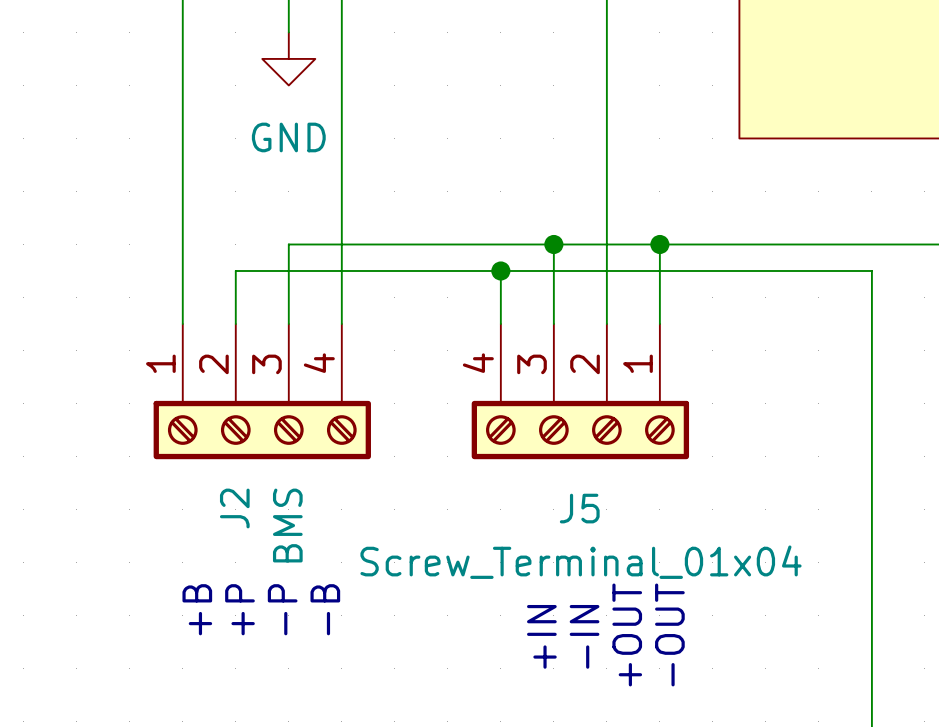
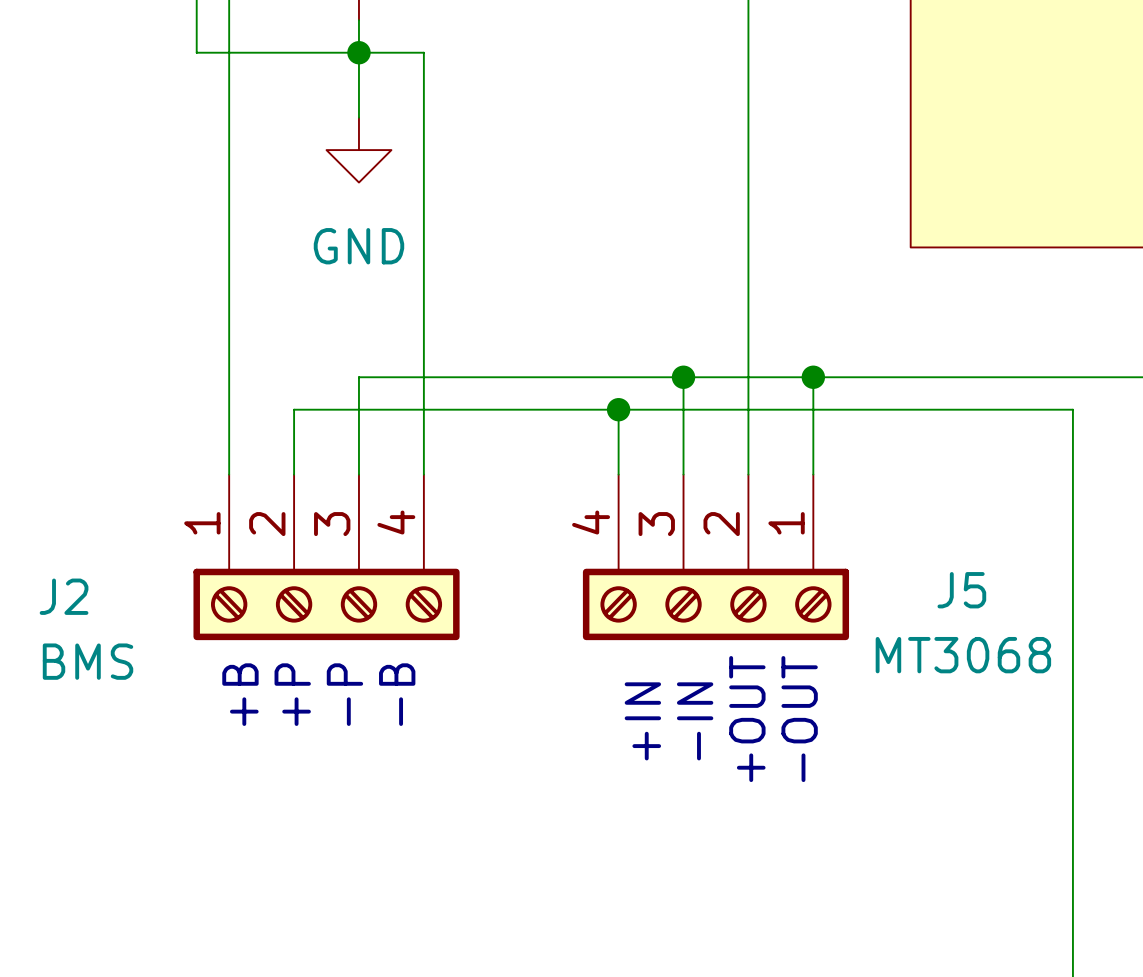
J2 name rotation: 0° (234, 508) -> 90° clockwise (64, 596)
J2 name position: J2 (234, 508) -> J2 (64, 596)
J5 name position: J5 (579, 508) -> J5 (961, 590)
J2 value rotation: 0° (287, 525) -> 90° clockwise (88, 661)
J2 value position: BMS (287, 525) -> BMS (88, 661)
J5 value: Screw_Terminal_01x04 (581, 562) -> MT3068 (963, 655)
text position: +B (197, 609) -> +B (240, 694)
text position: +P (239, 609) -> +P (292, 694)
text position: -P (282, 609) -> -P (344, 694)
text position: -B (325, 609) -> -B (397, 694)
text position: +OUT (627, 634) -> +OUT (747, 719)
text position: -OUT (669, 634) -> -OUT (799, 719)
text position: +IN (541, 636) -> +IN (642, 721)
text position: -IN (584, 636) -> -IN (695, 721)

